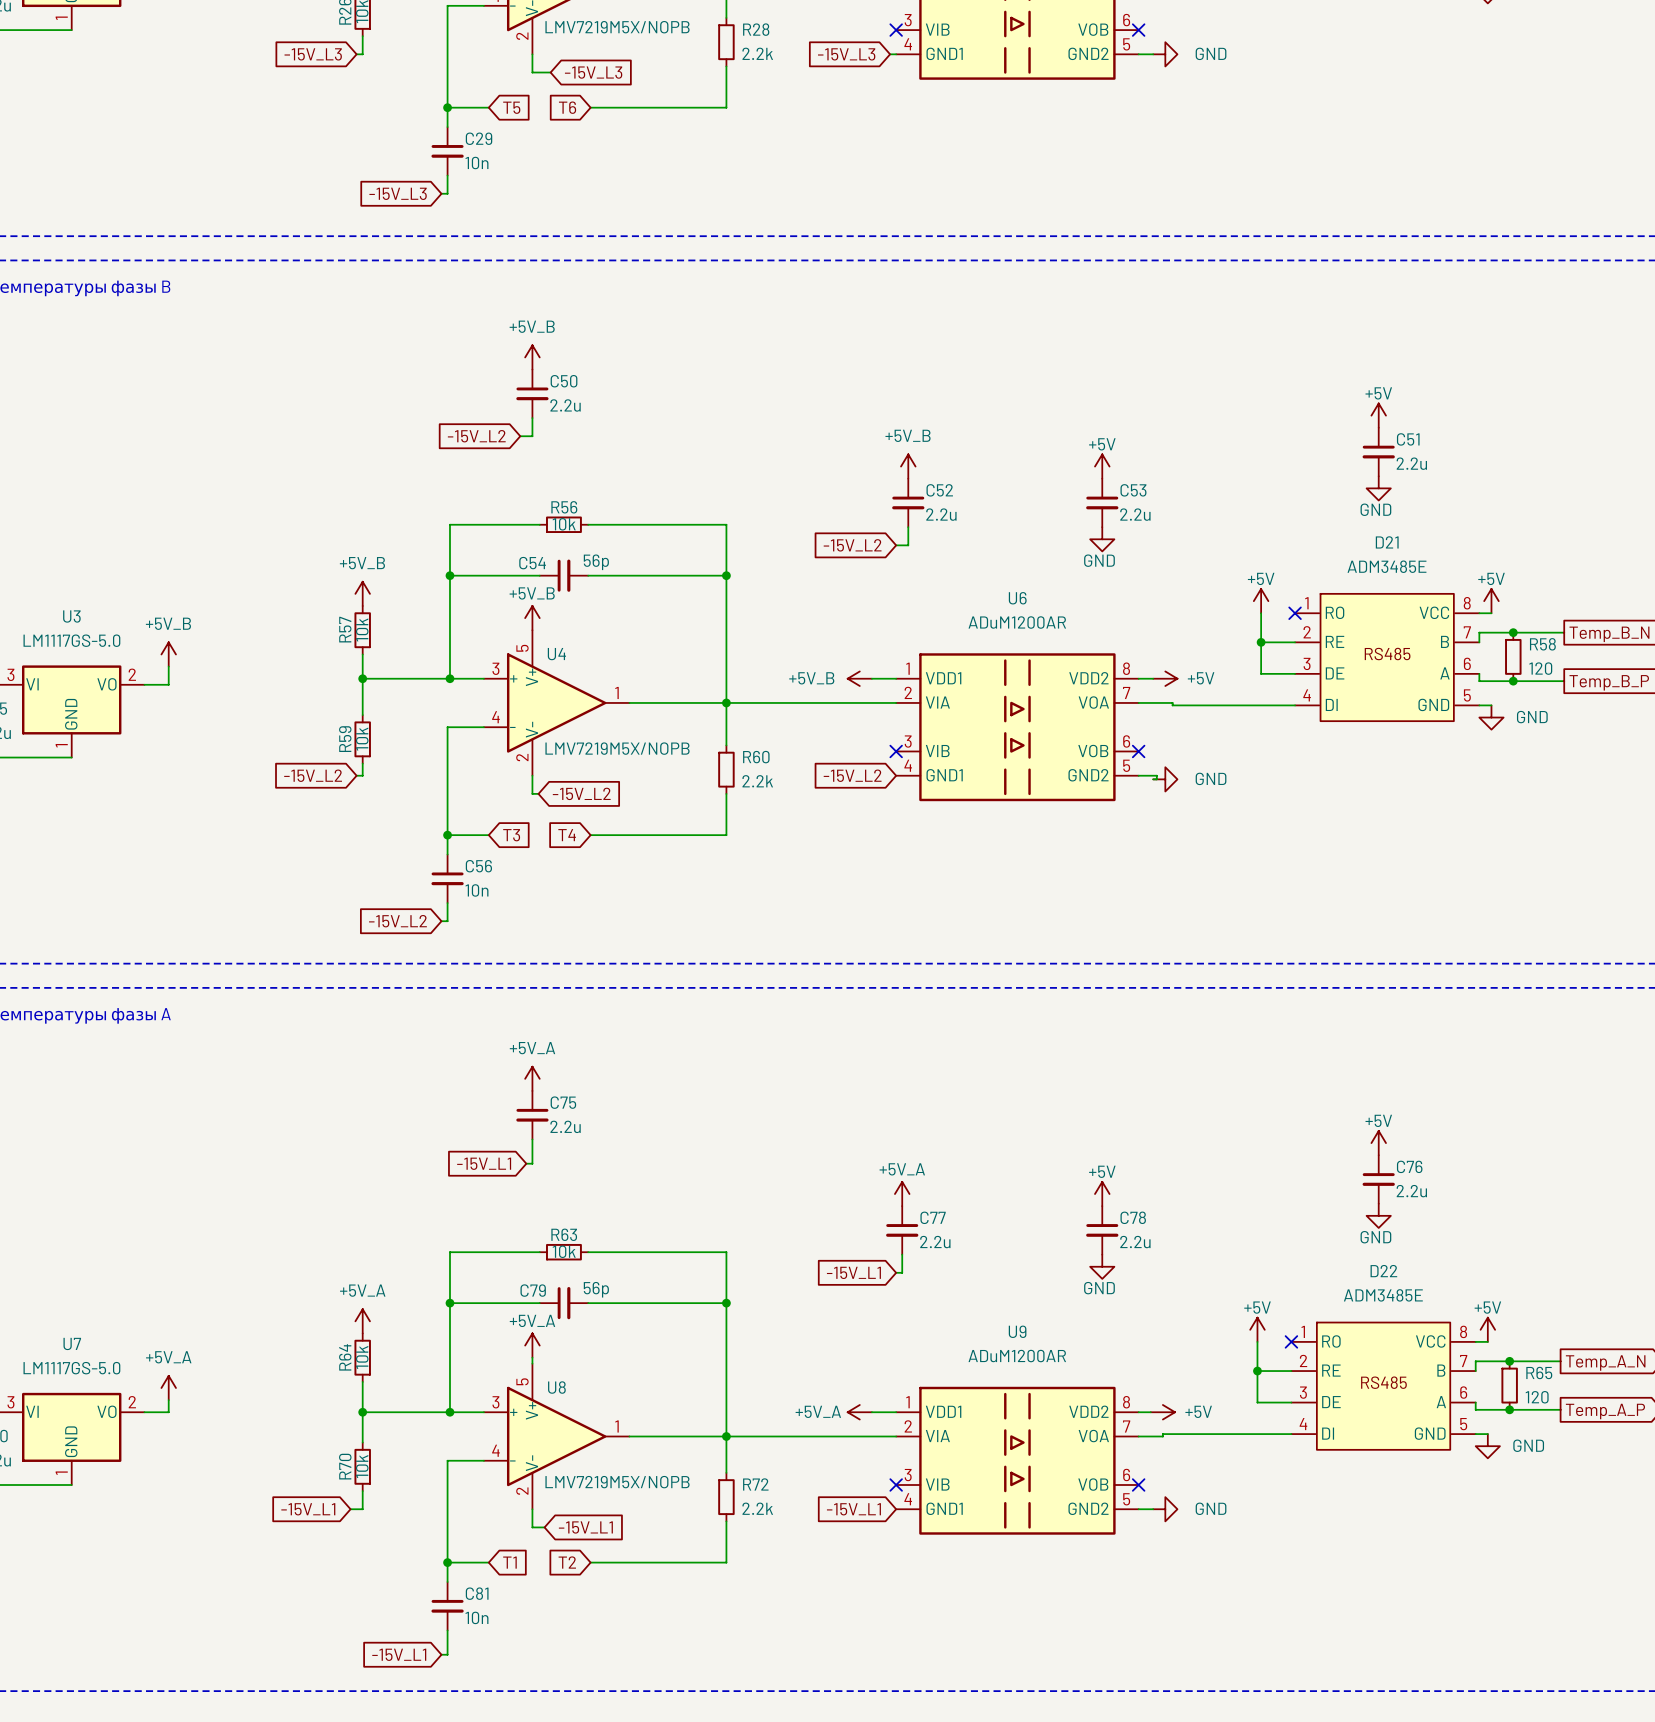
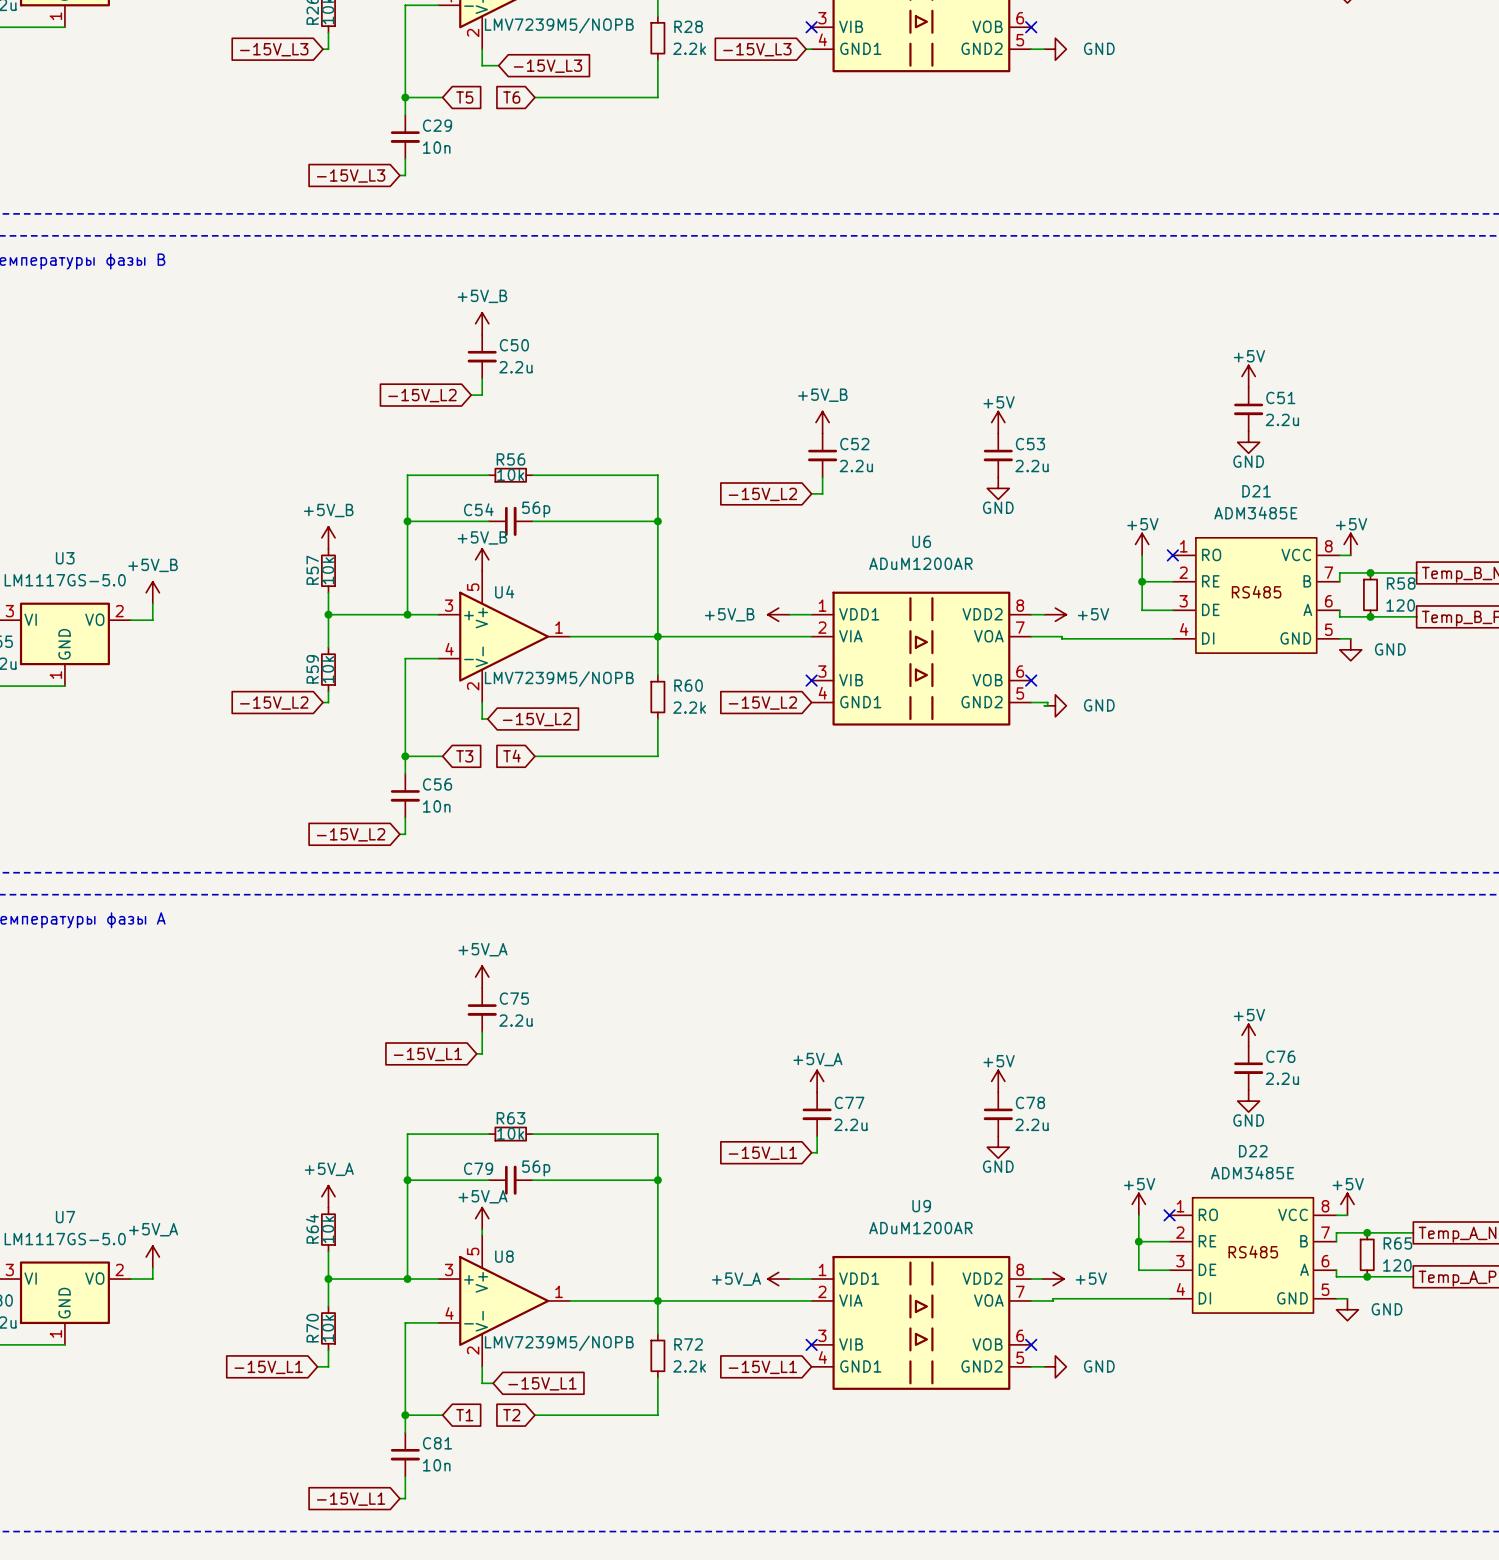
part value: LMV7219M5X/NOPB (617, 27) -> LMV7239M5/NOPB (559, 25)
U4 value: LMV7219M5X/NOPB (617, 748) -> LMV7239M5/NOPB (559, 679)
U8 value: LMV7219M5X/NOPB (617, 1482) -> LMV7239M5/NOPB (559, 1343)

